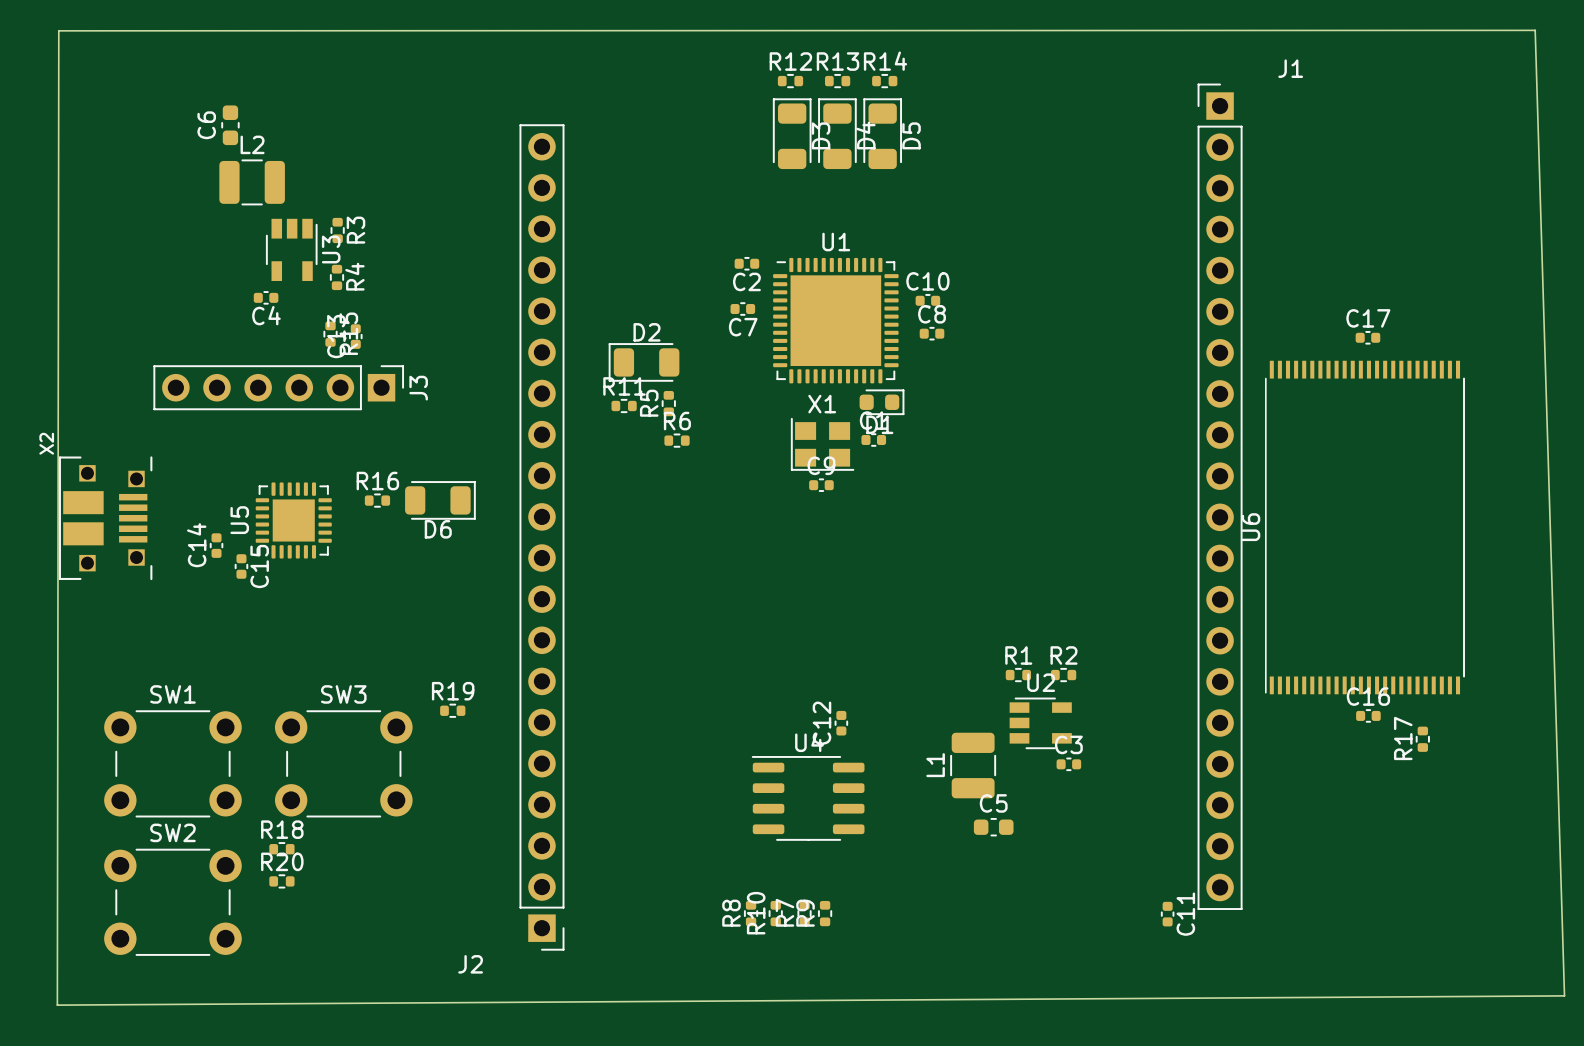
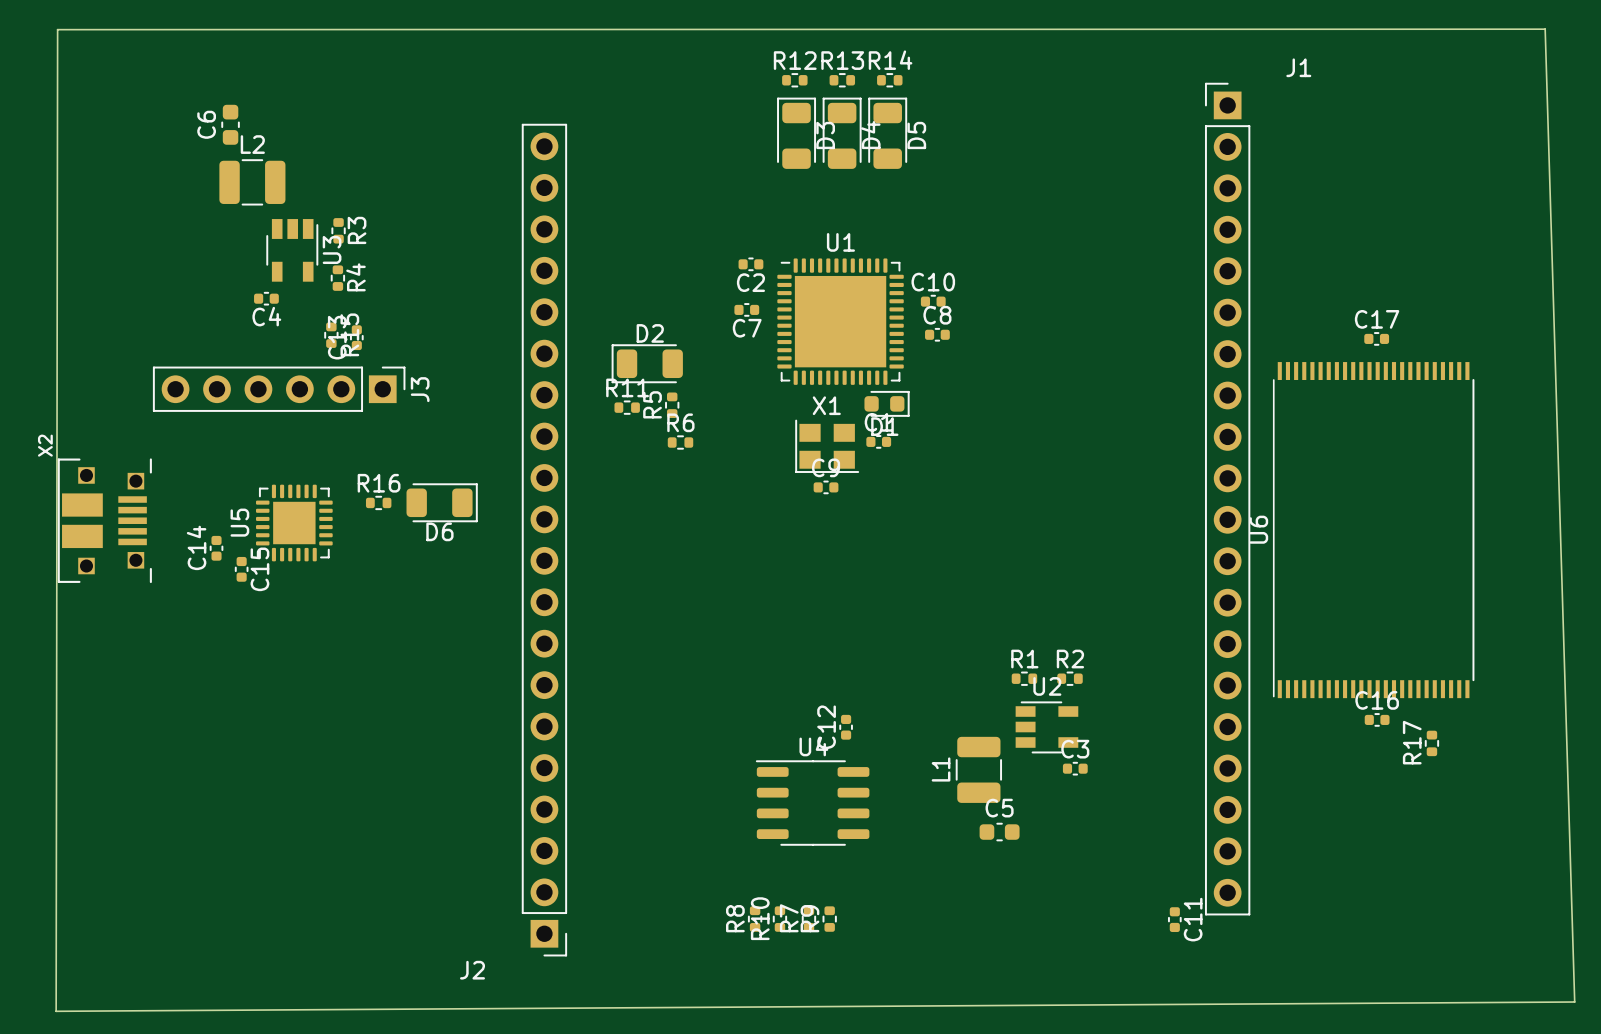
R19: (452, 710) -> none
SW1: (172, 763) -> none
SW3: (343, 763) -> none
R18: (281, 849) -> none
R20: (281, 881) -> none
SW2: (172, 902) -> none

